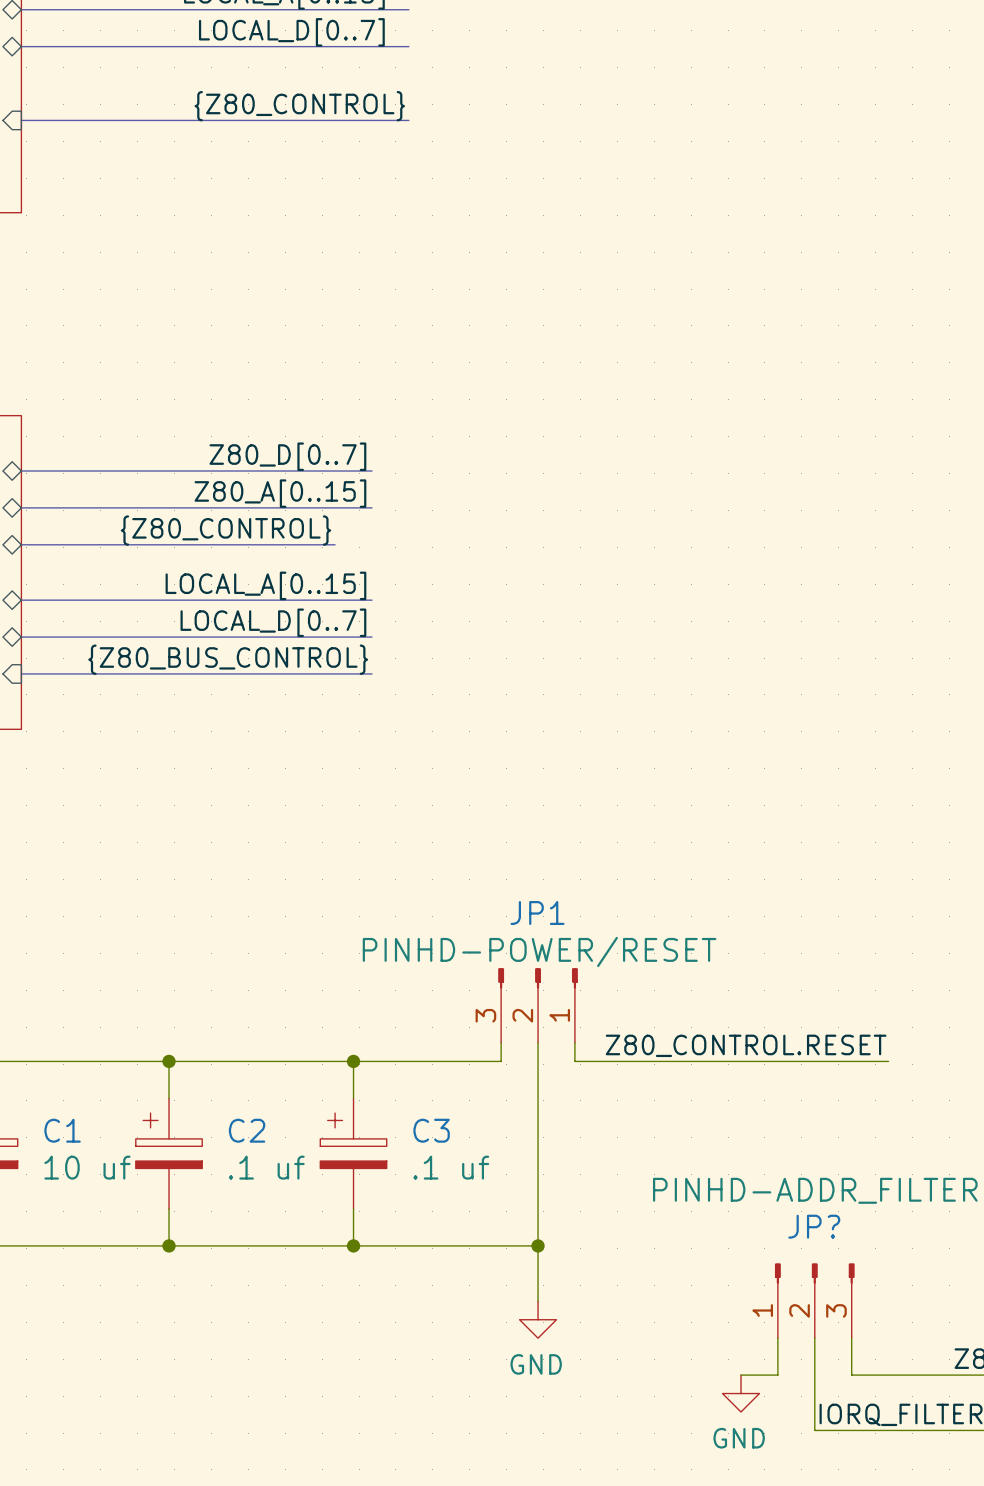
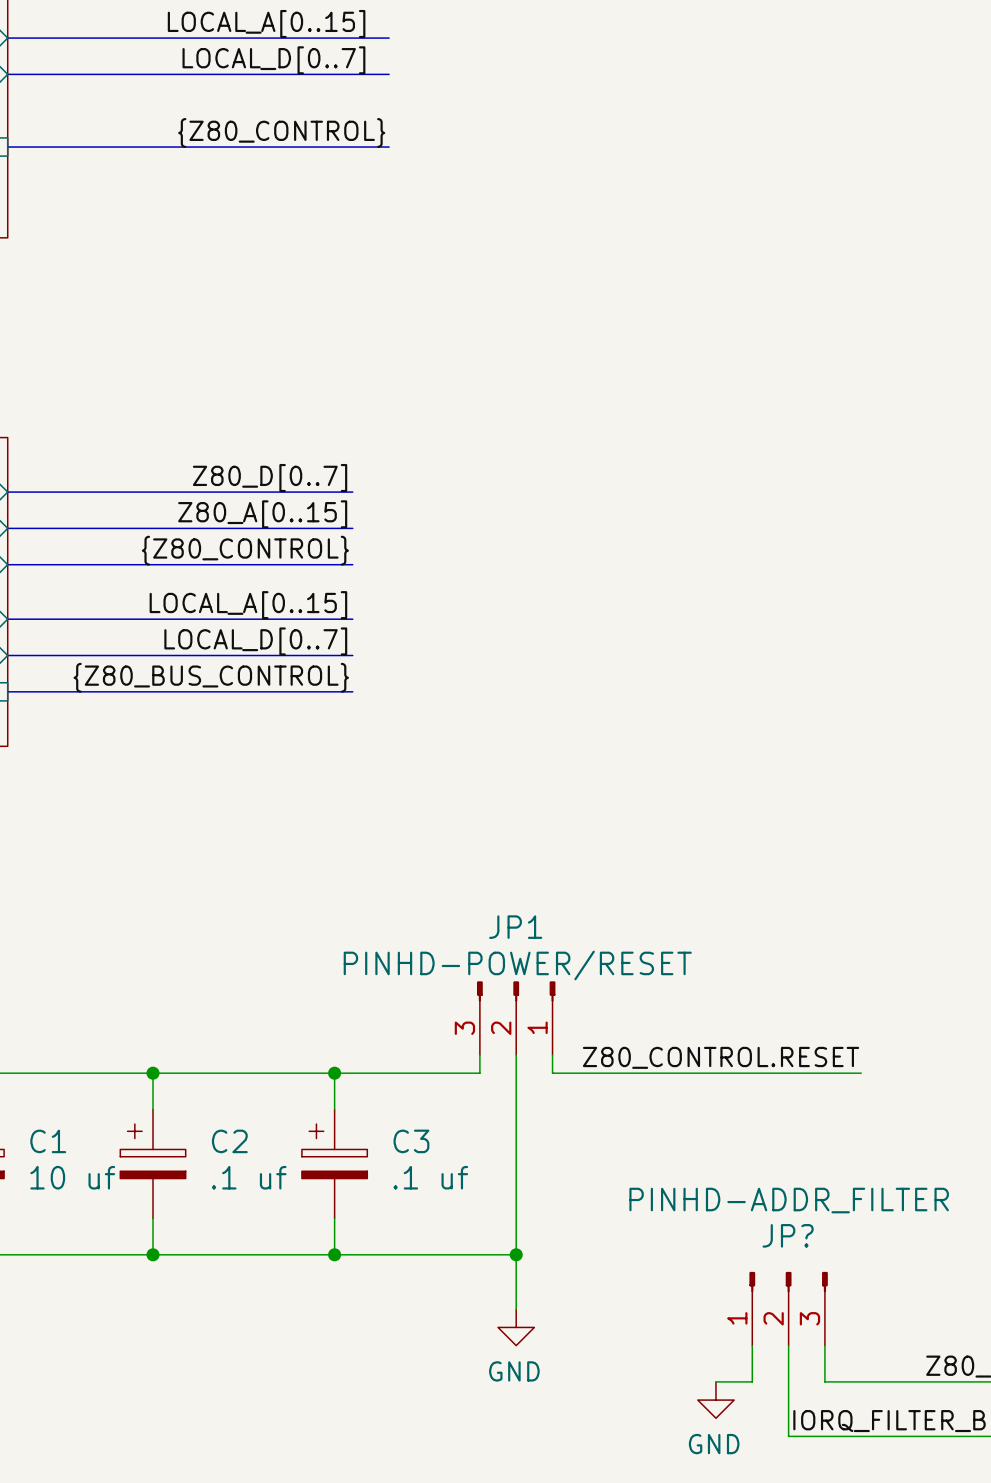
label position: {Z80_CONTROL} (225, 530) -> {Z80_CONTROL} (245, 550)
bus: none -> (316, 564) (352, 564)

